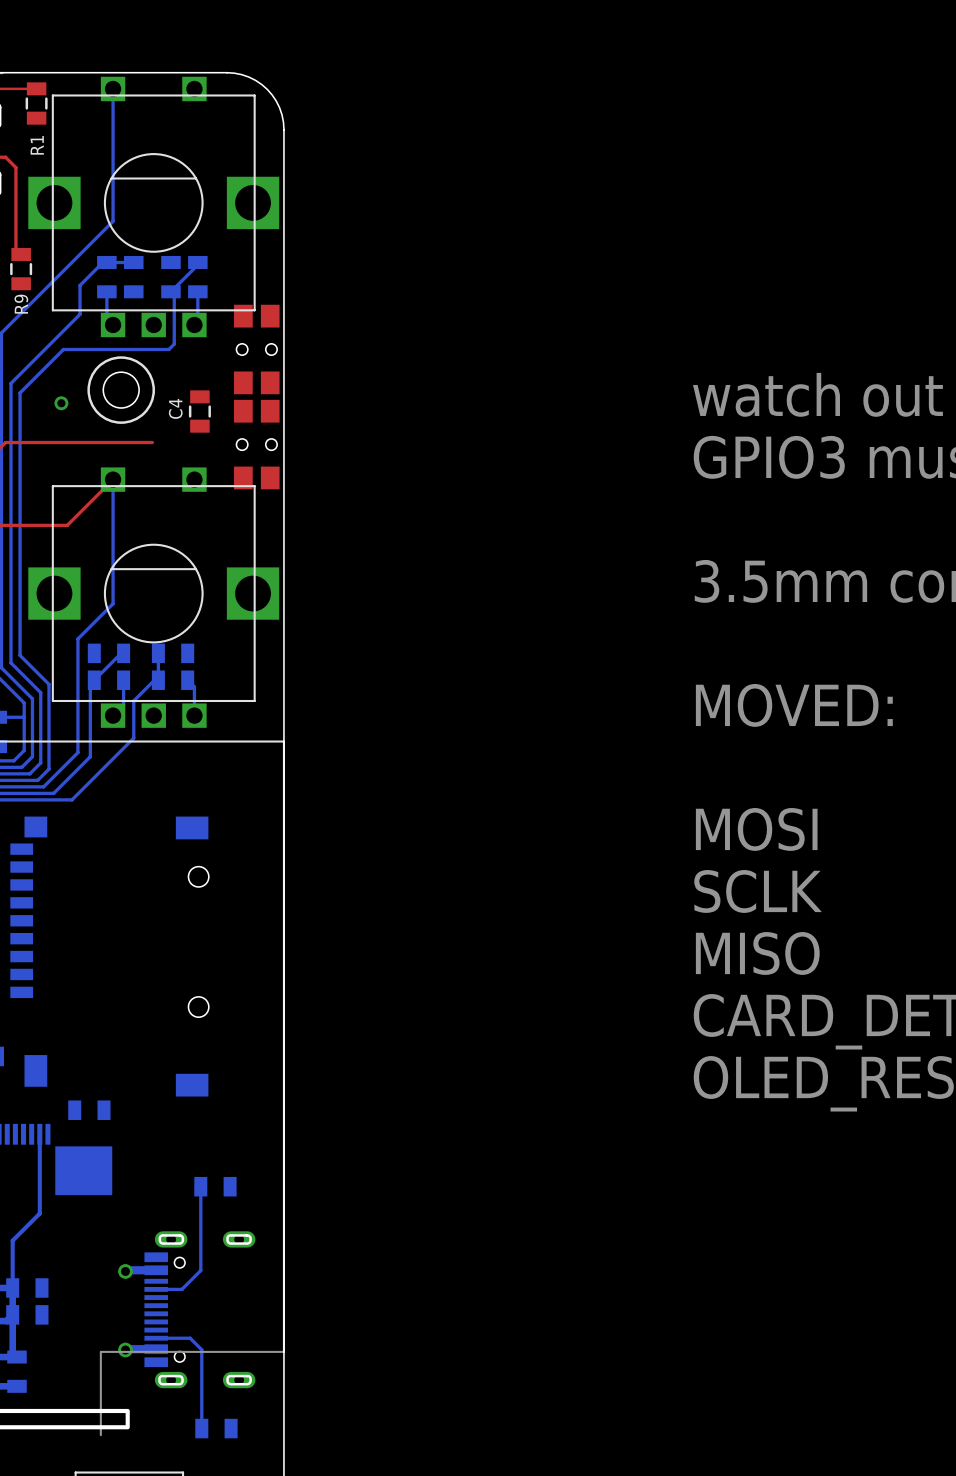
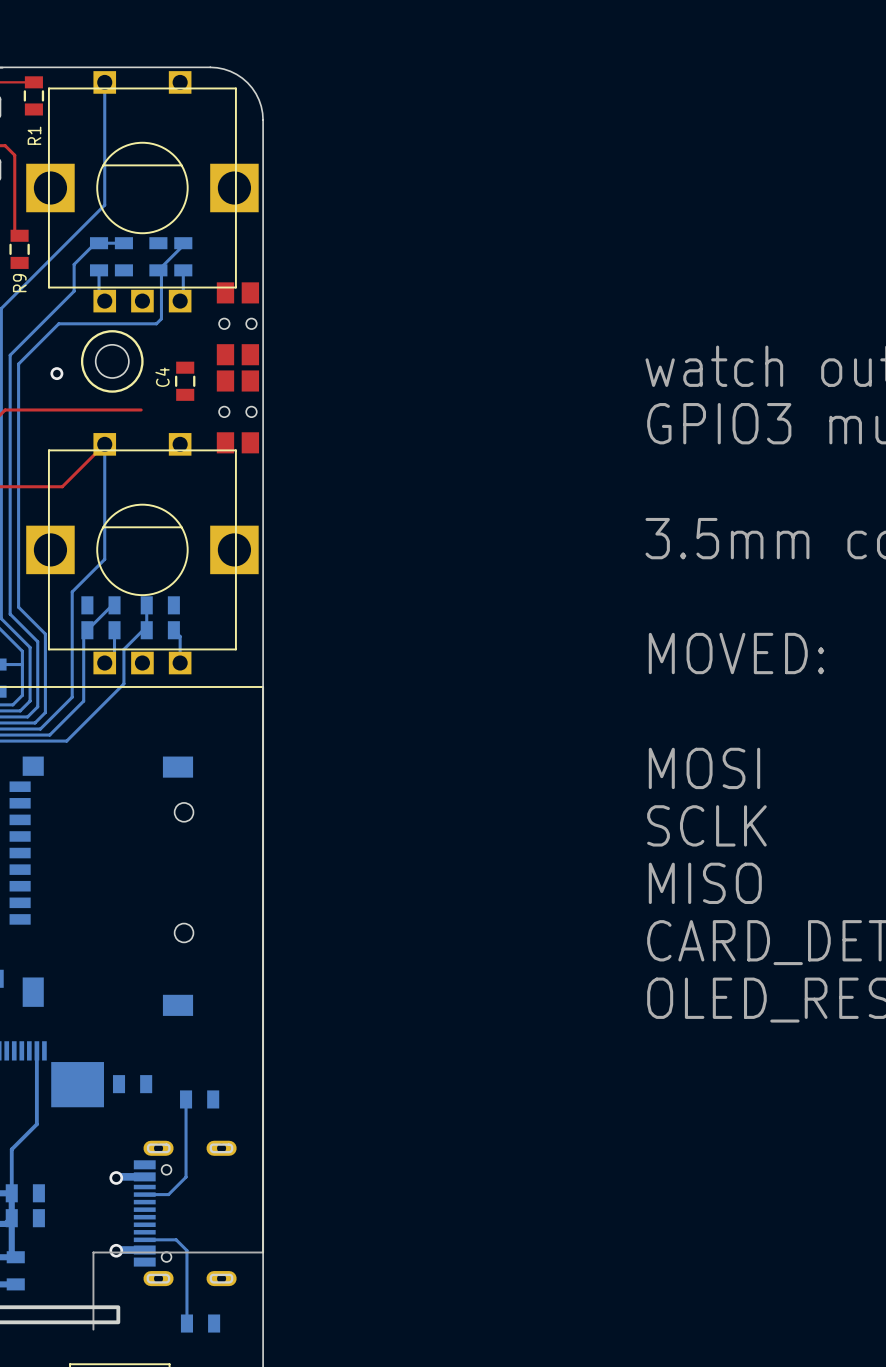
part position: (89, 1110) -> (132, 1084)

